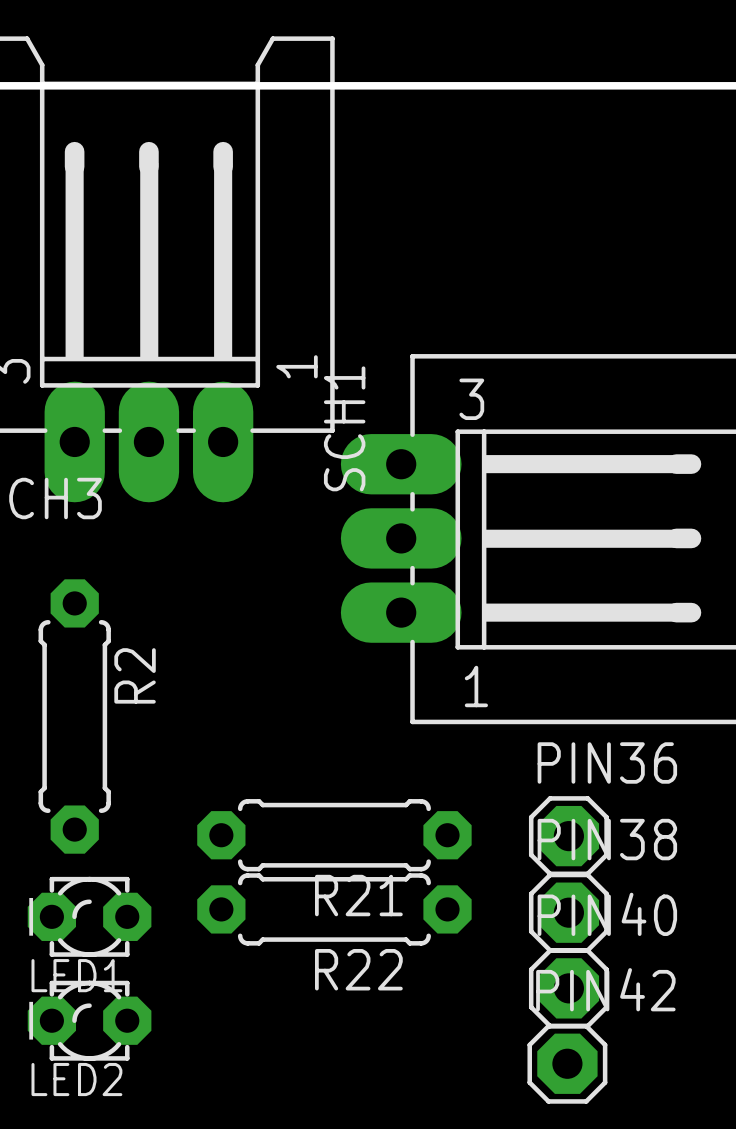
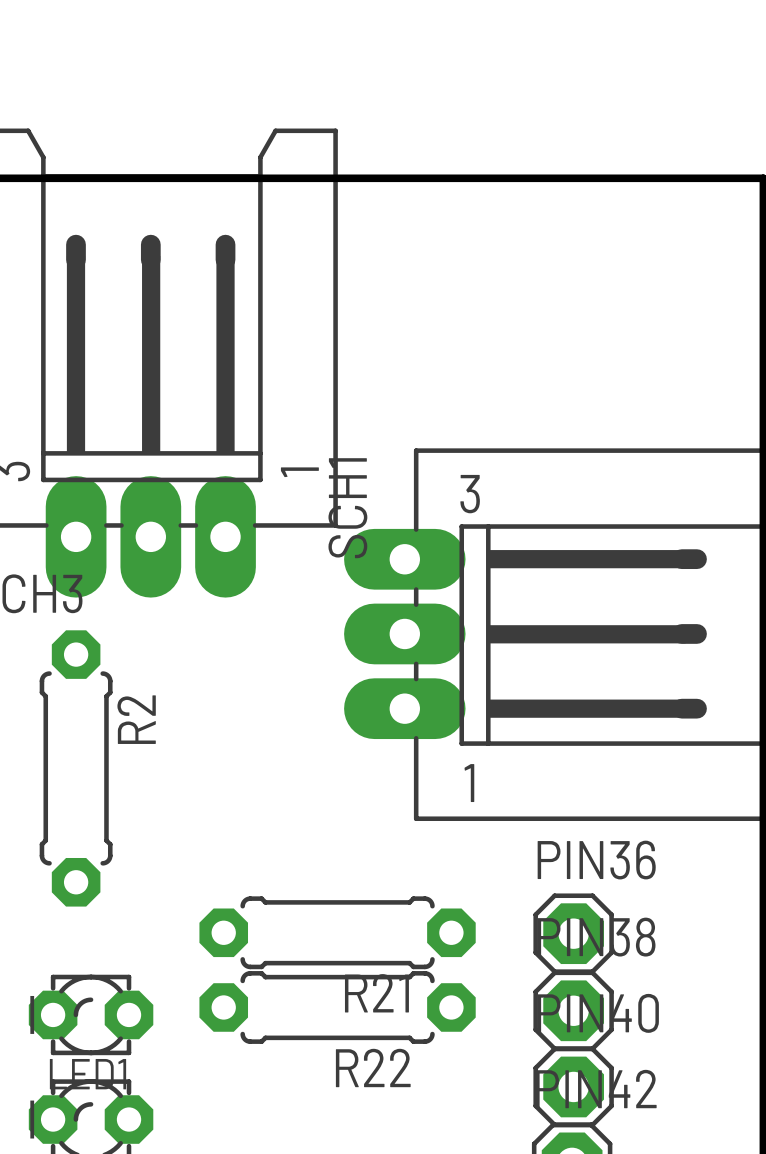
R2 position: (74, 716) -> (76, 768)

